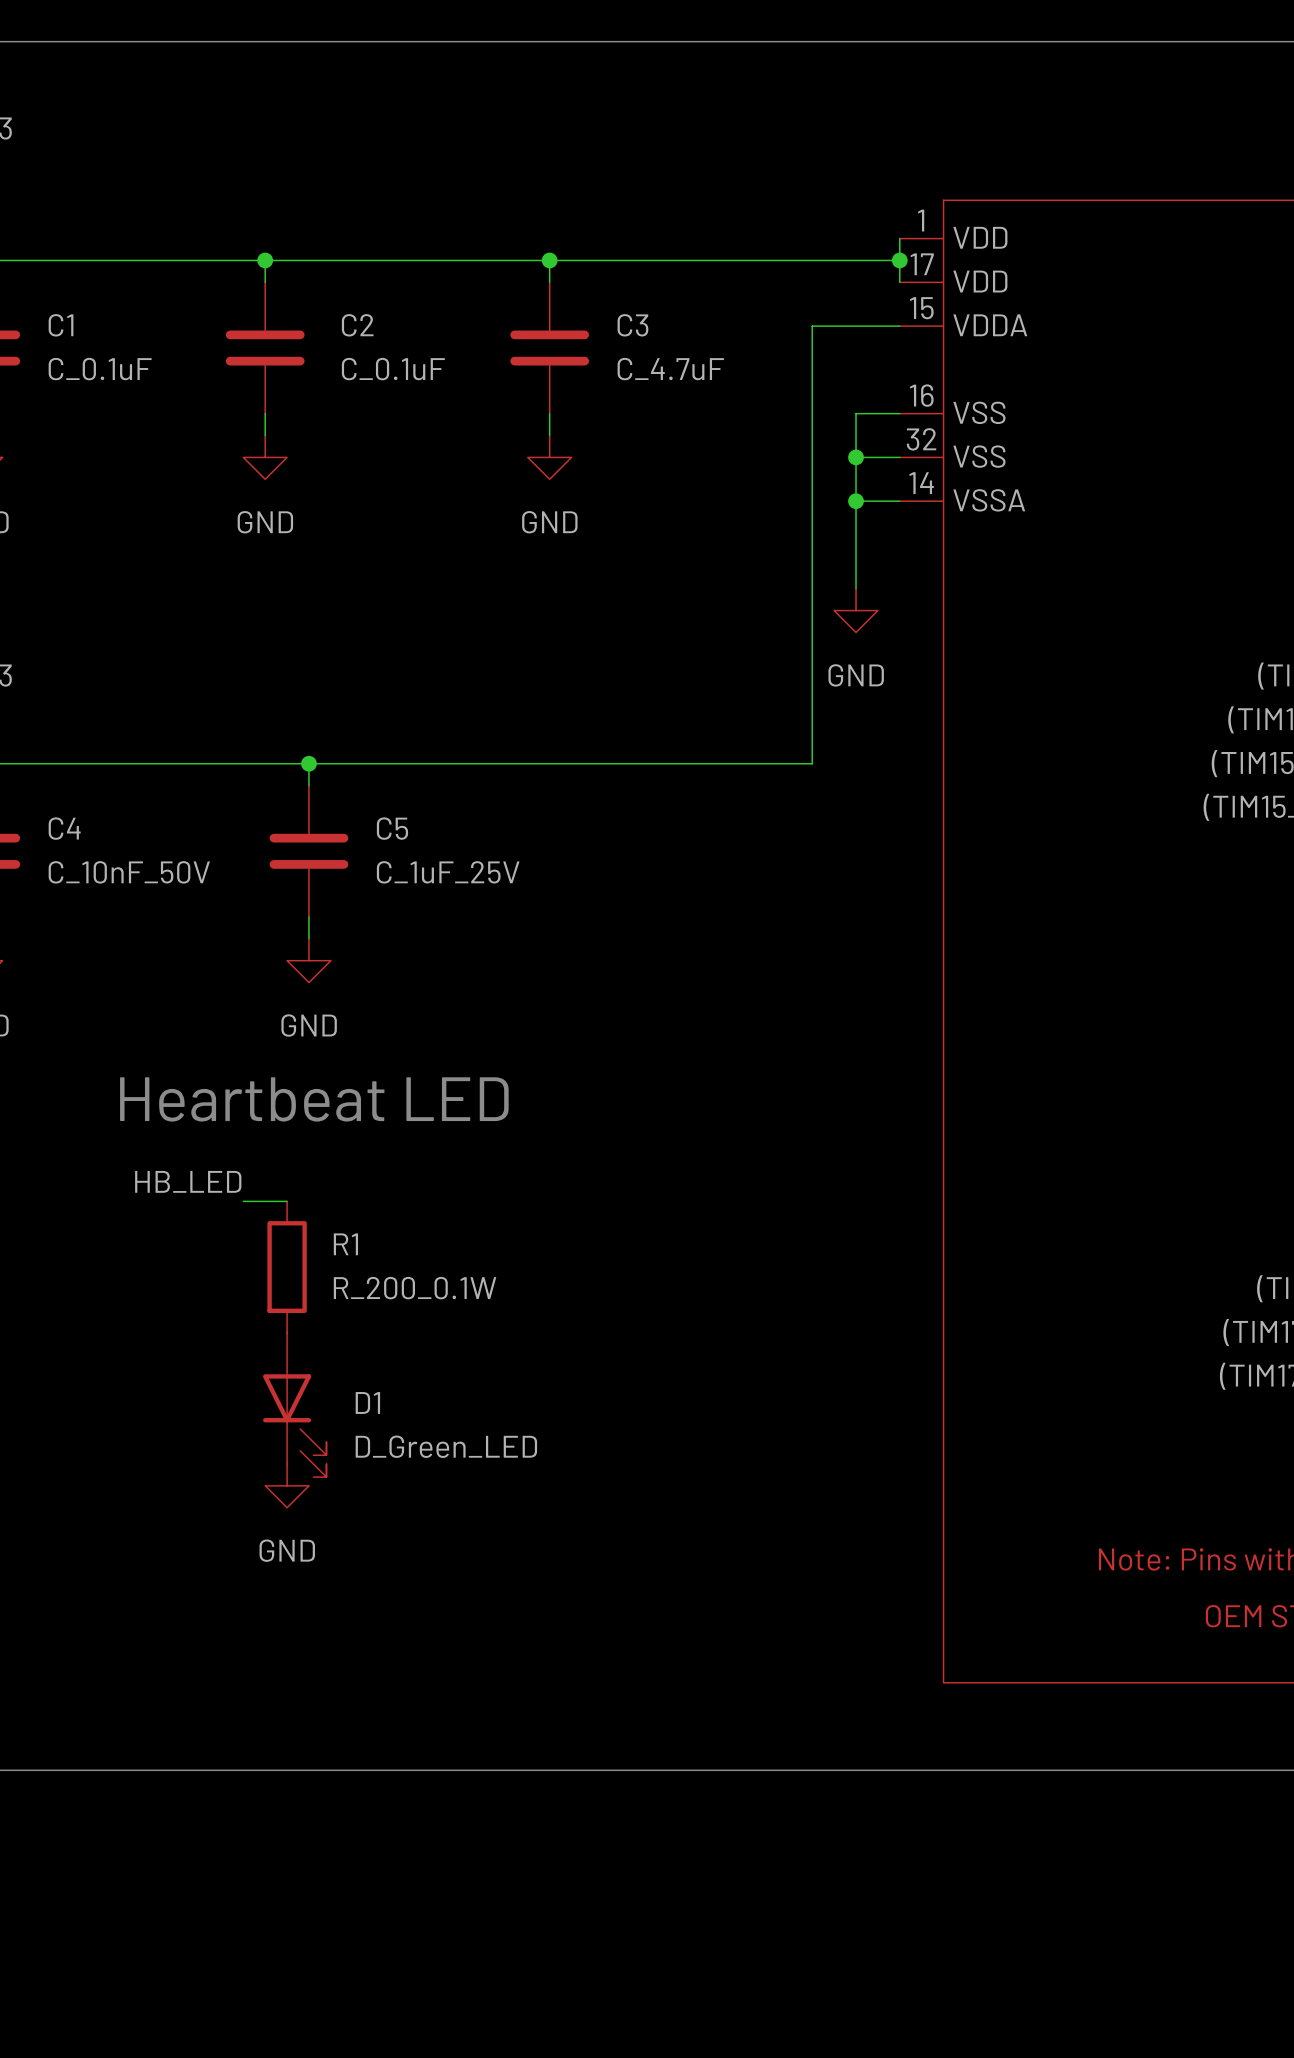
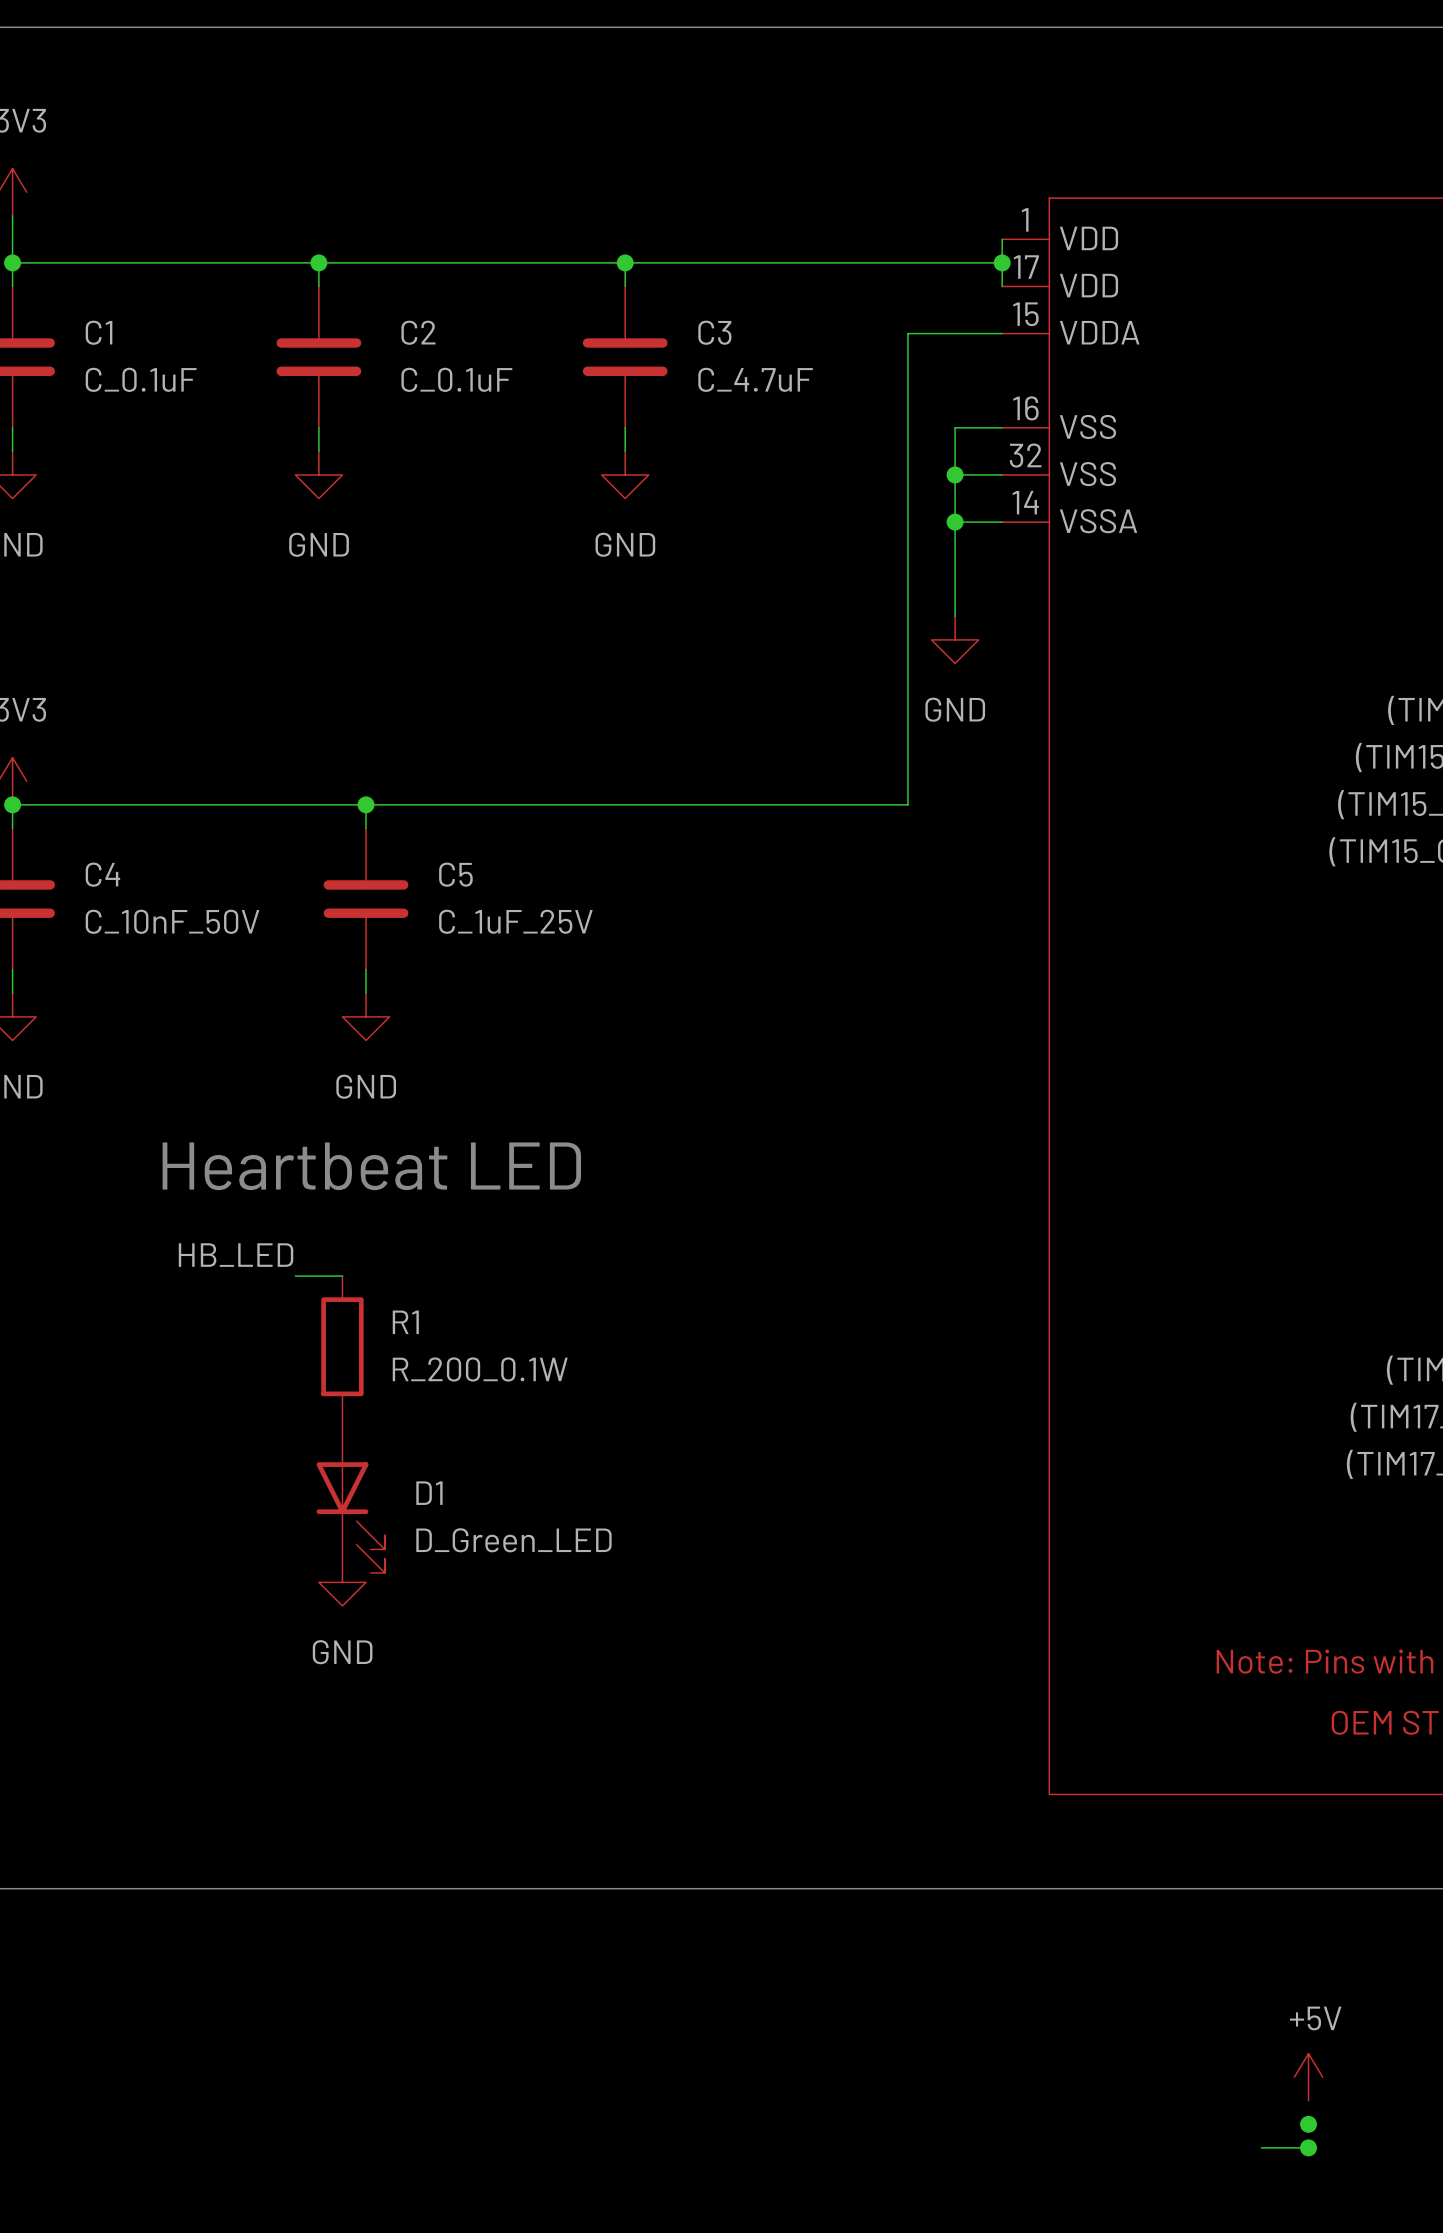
power symbol: none -> +5V (1308, 2077)
junction: none -> (1308, 2124)
wire: none -> (1261, 2147) (1308, 2147)
junction: none -> (1308, 2147)

